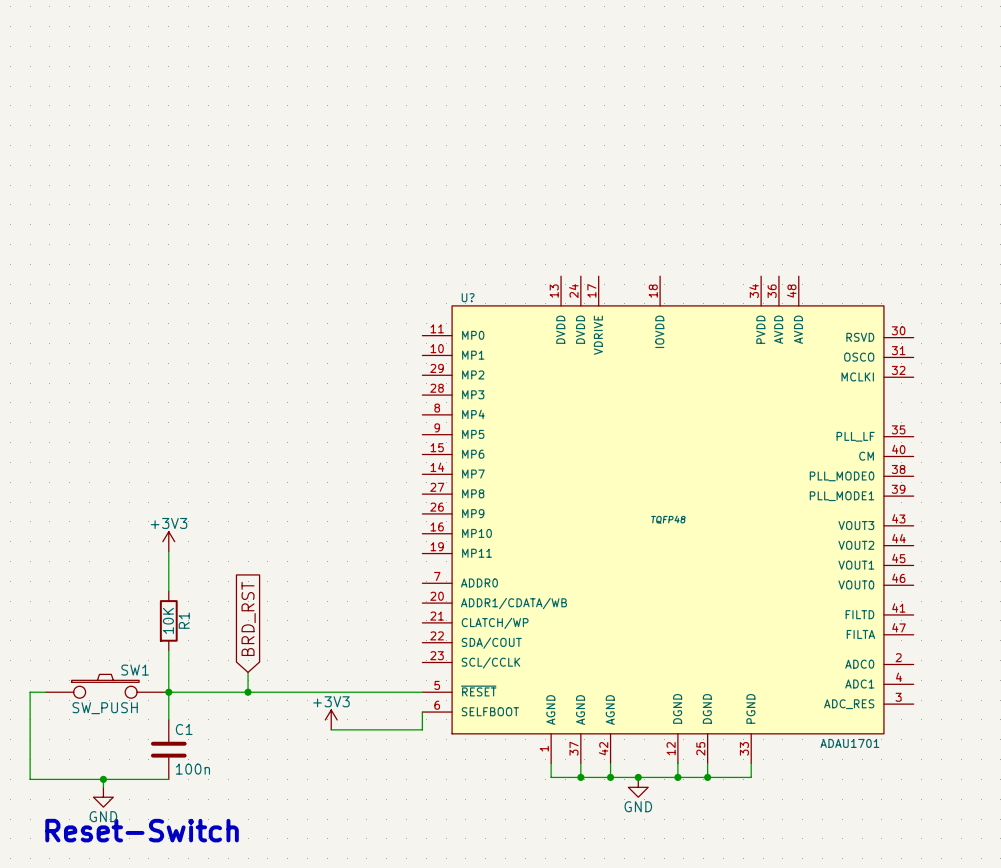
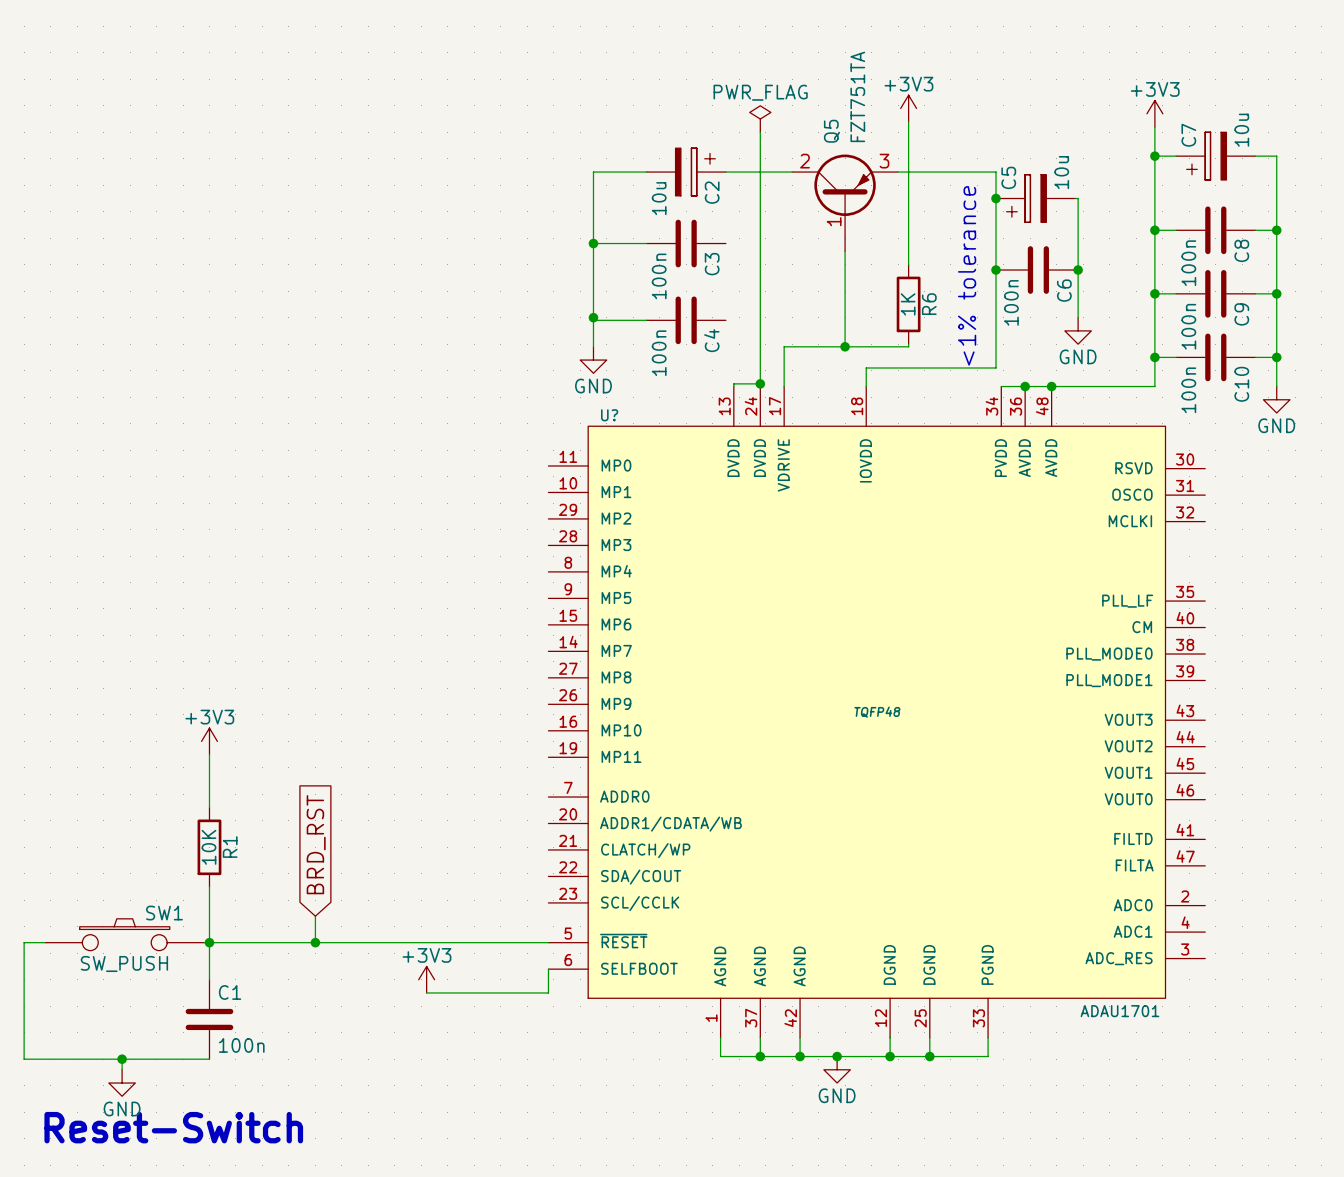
power symbol: none -> +3V3 (908, 108)
power symbol: none -> +3V3 (1154, 113)
power symbol: none -> PWR_FLAG (760, 119)
wire: none -> (908, 121) (908, 264)
wire: none -> (1154, 127) (1154, 386) (1001, 386)
wire: none -> (760, 132) (760, 386)
wire: none -> (1154, 156) (1176, 156)
junction: none -> (1154, 156)
C7: none -> 10u (1215, 156)
wire: none -> (1255, 156) (1276, 156) (1276, 386)
wire: none -> (646, 172) (593, 172) (593, 346)
C2: none -> 10u (686, 172)
wire: none -> (725, 172) (792, 172)
wire: none -> (898, 172) (996, 172) (996, 368) (866, 368) (866, 386)
junction: none -> (996, 198)
C5: none -> 10u (1035, 198)
wire: none -> (1075, 198) (1078, 198) (1078, 317)
Q5: none -> FZT751TA (845, 203)
wire: none -> (1154, 230) (1176, 230)
junction: none -> (1154, 230)
C8: none -> 100n (1215, 230)
wire: none -> (1255, 230) (1276, 230)
junction: none -> (1276, 230)
wire: none -> (593, 243) (646, 243)
junction: none -> (593, 243)
C3: none -> 100n (686, 243)
wire: none -> (845, 251) (845, 346)
junction: none -> (996, 270)
C6: none -> 100n (1038, 270)
junction: none -> (1078, 270)
text: none -> <1% tolerance (967, 275)
wire: none -> (1154, 293) (1176, 293)
junction: none -> (1154, 293)
C9: none -> 100n (1215, 293)
wire: none -> (1255, 293) (1276, 293)
junction: none -> (1276, 293)
R6: none -> 1K (908, 304)
junction: none -> (593, 317)
wire: none -> (593, 320) (646, 320)
C4: none -> 100n (686, 320)
power symbol: none -> GND (1078, 330)
wire: none -> (908, 344) (908, 346) (784, 346) (784, 386)
junction: none -> (845, 346)
wire: none -> (1154, 357) (1176, 357)
junction: none -> (1154, 357)
C10: none -> 100n (1215, 357)
wire: none -> (1255, 357) (1276, 357)
junction: none -> (1276, 357)
power symbol: none -> GND (593, 360)
wire: none -> (760, 383) (733, 383) (733, 386)
junction: none -> (760, 383)
junction: none -> (1025, 386)
junction: none -> (1051, 386)
power symbol: none -> GND (1276, 399)

